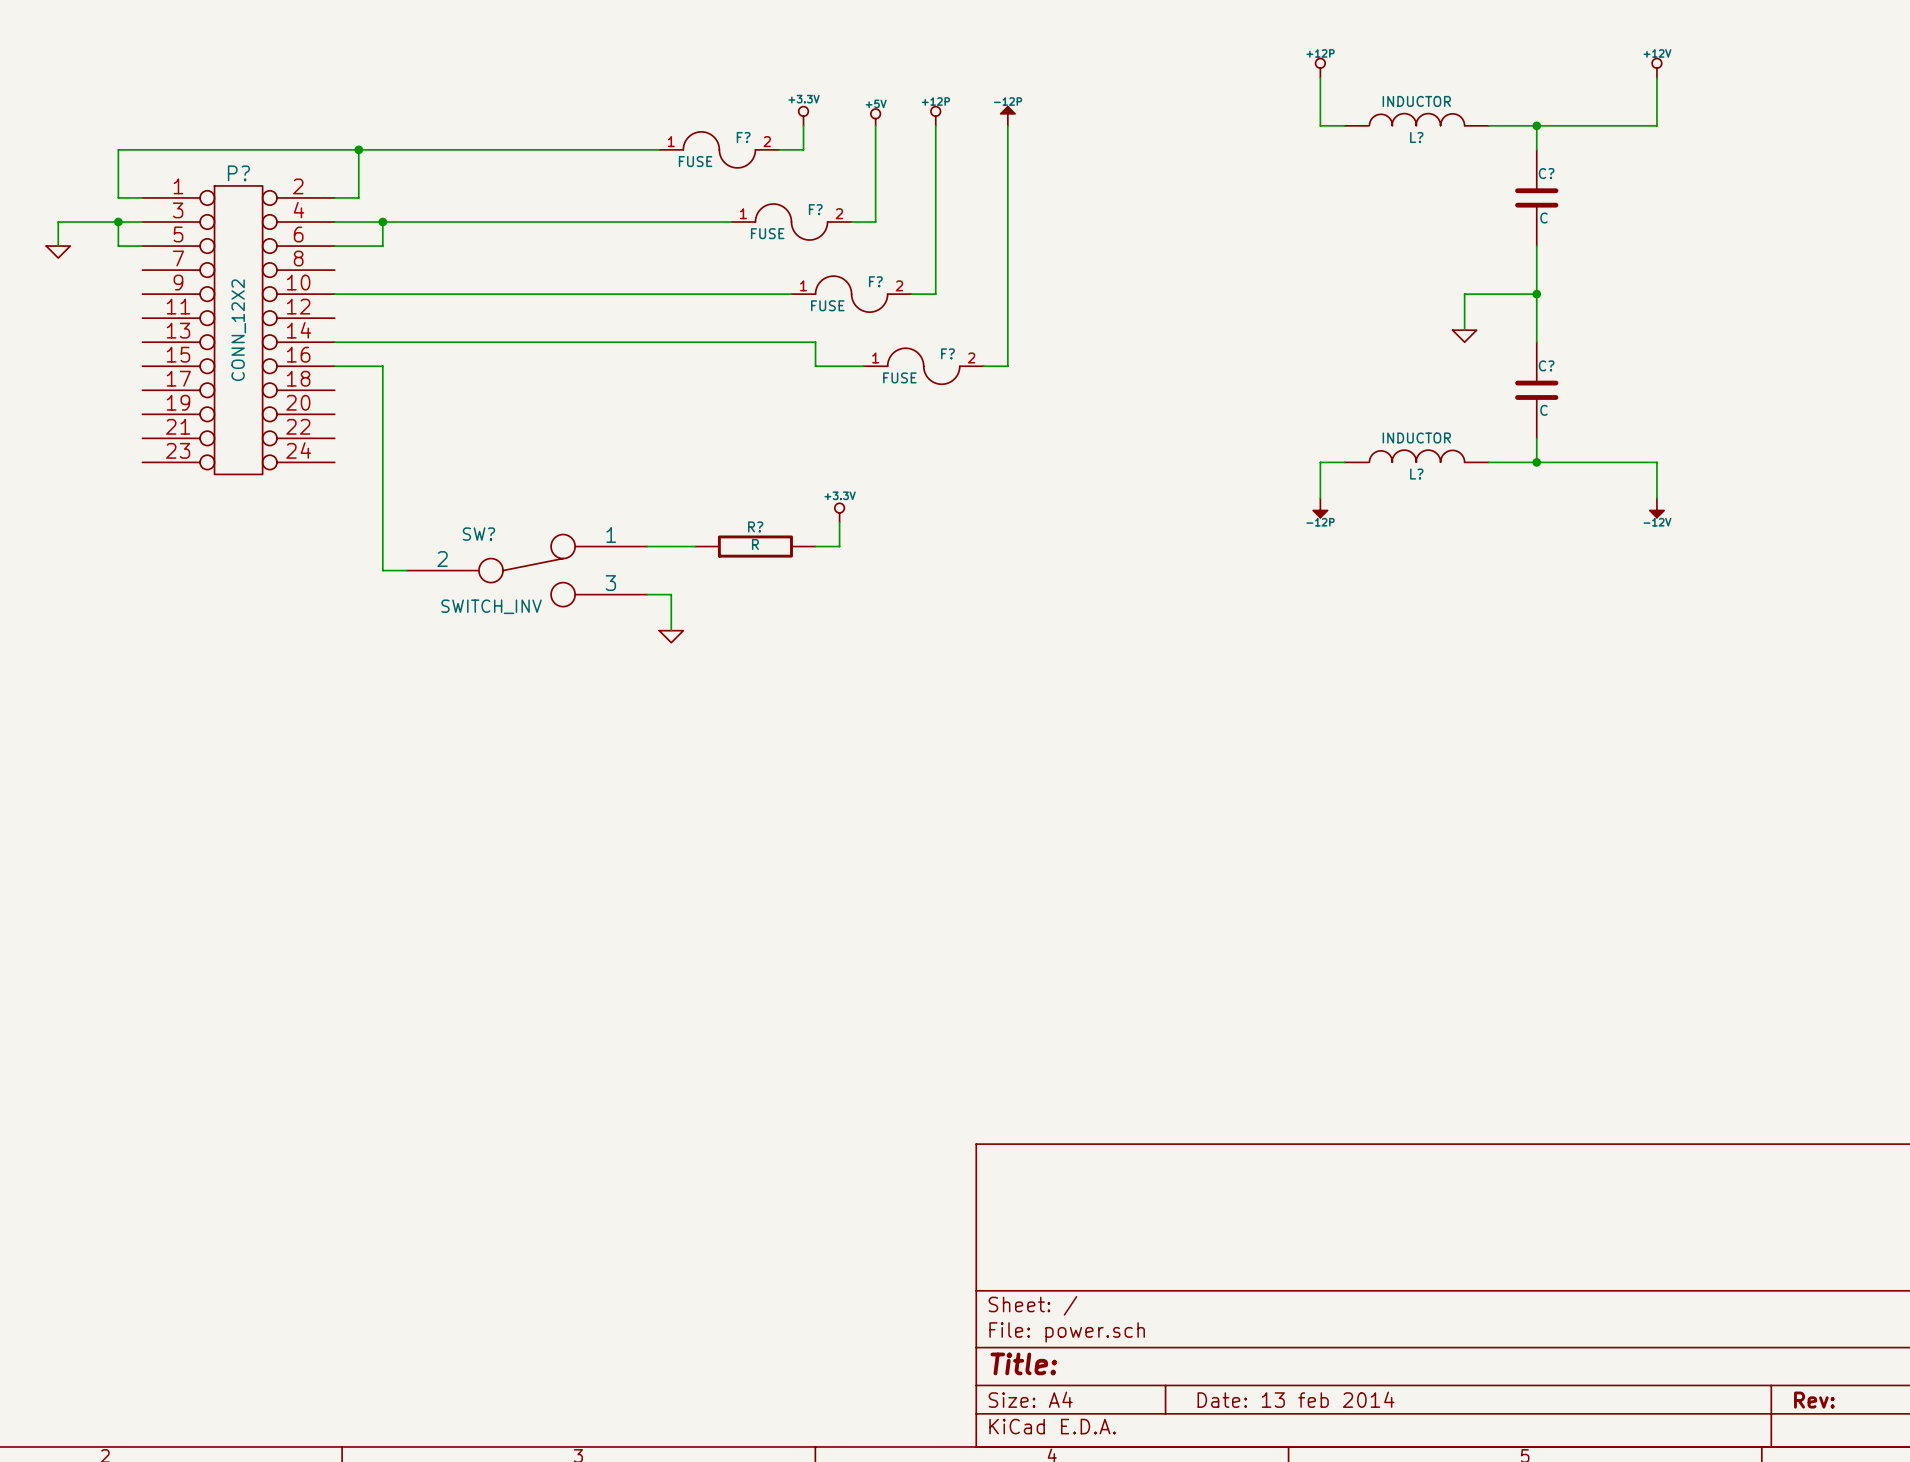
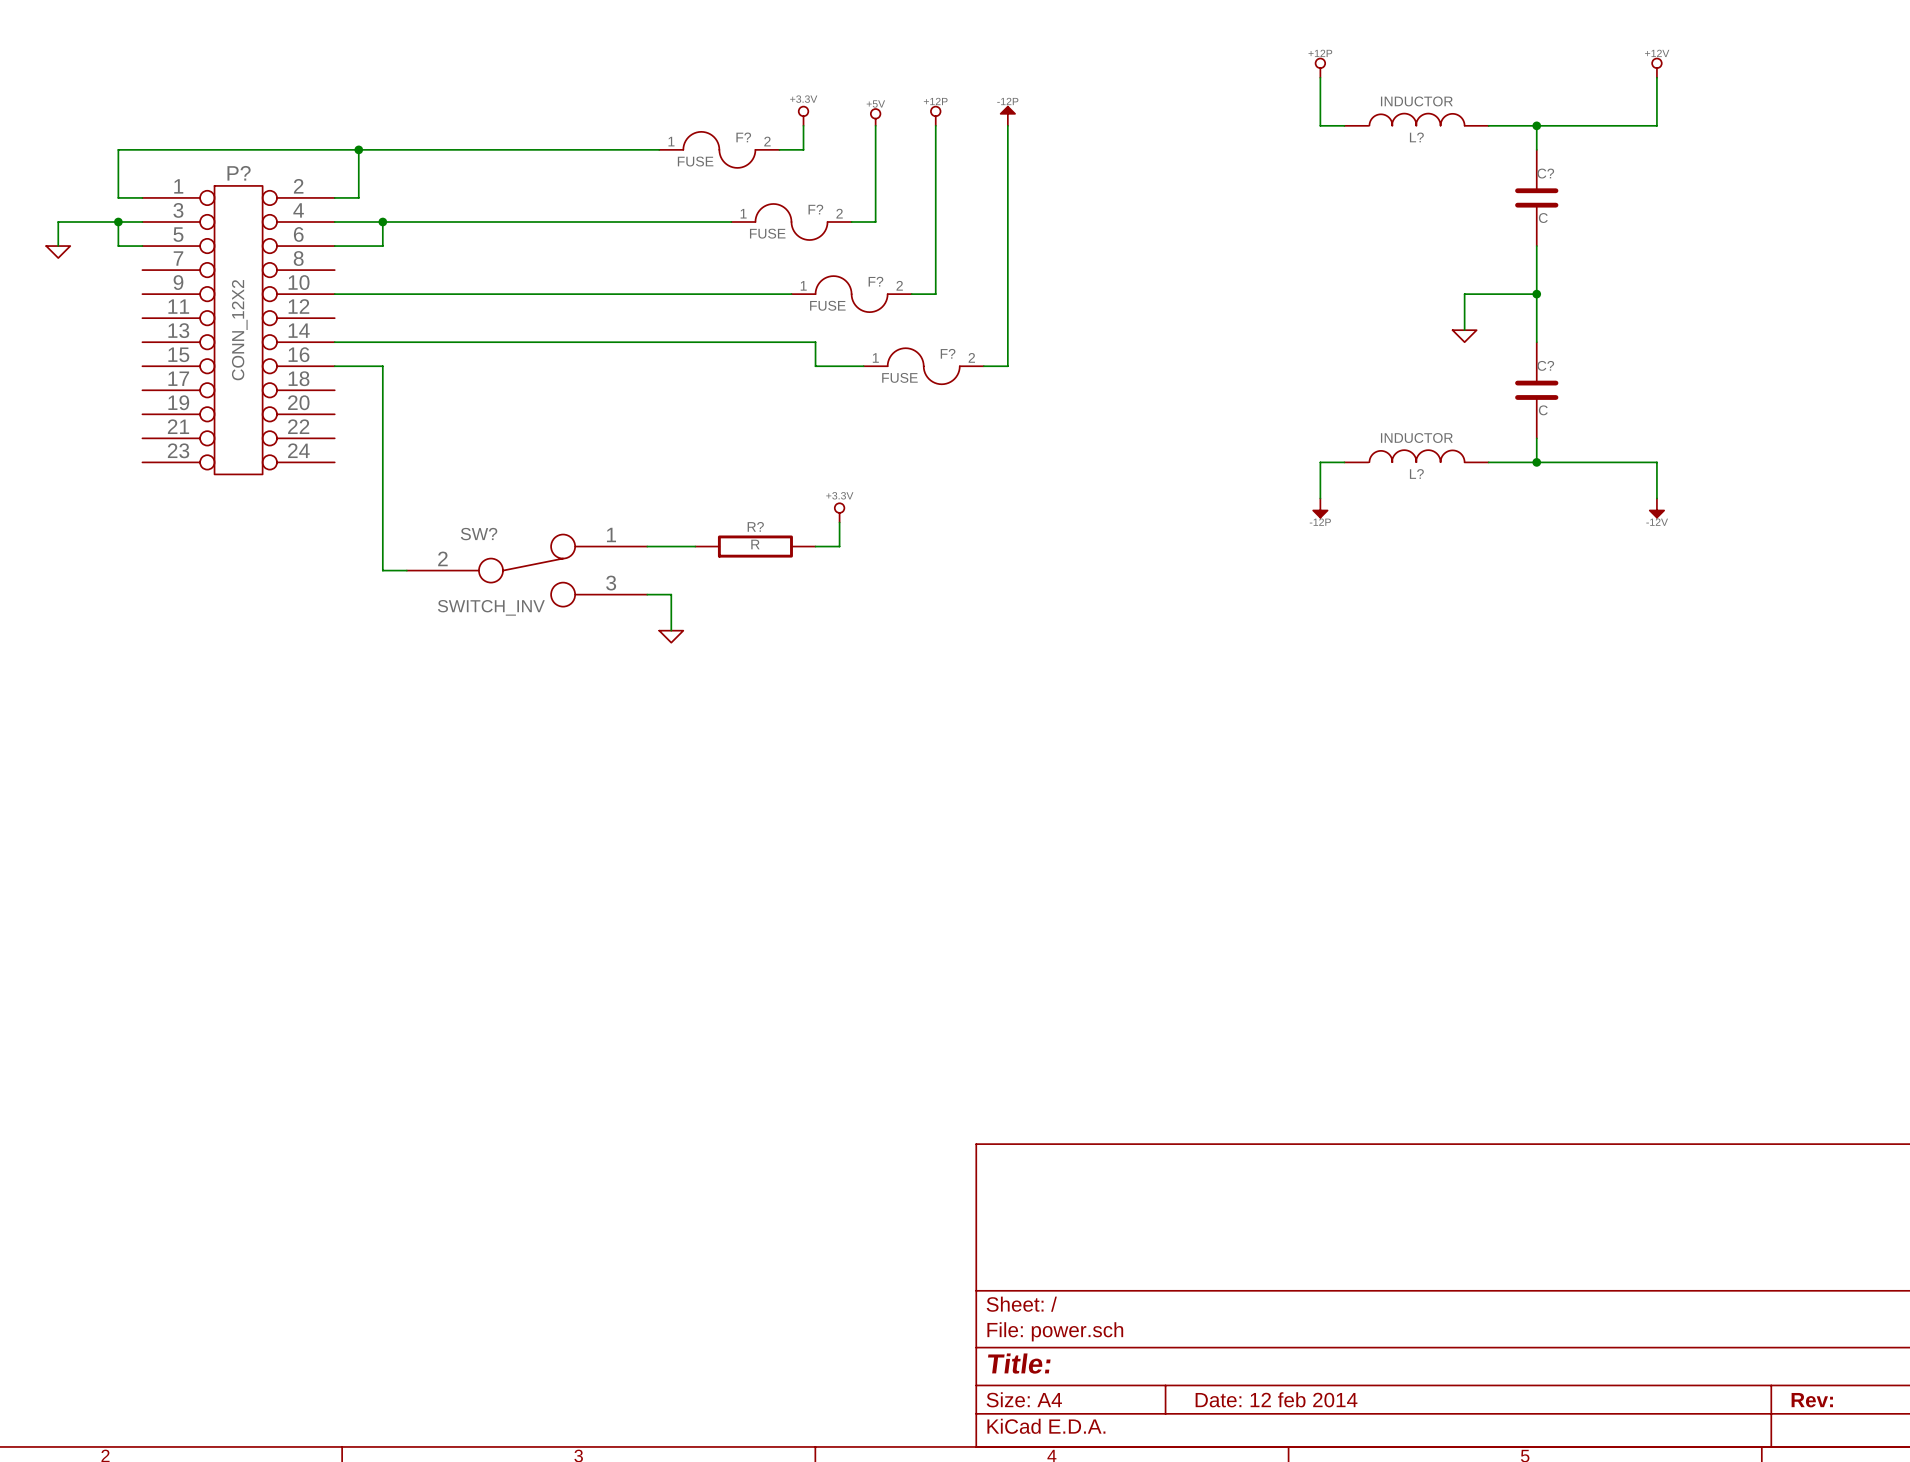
title block: Date: 13 feb 2014 (1295, 1399) -> Date: 12 feb 2014 (1276, 1399)

